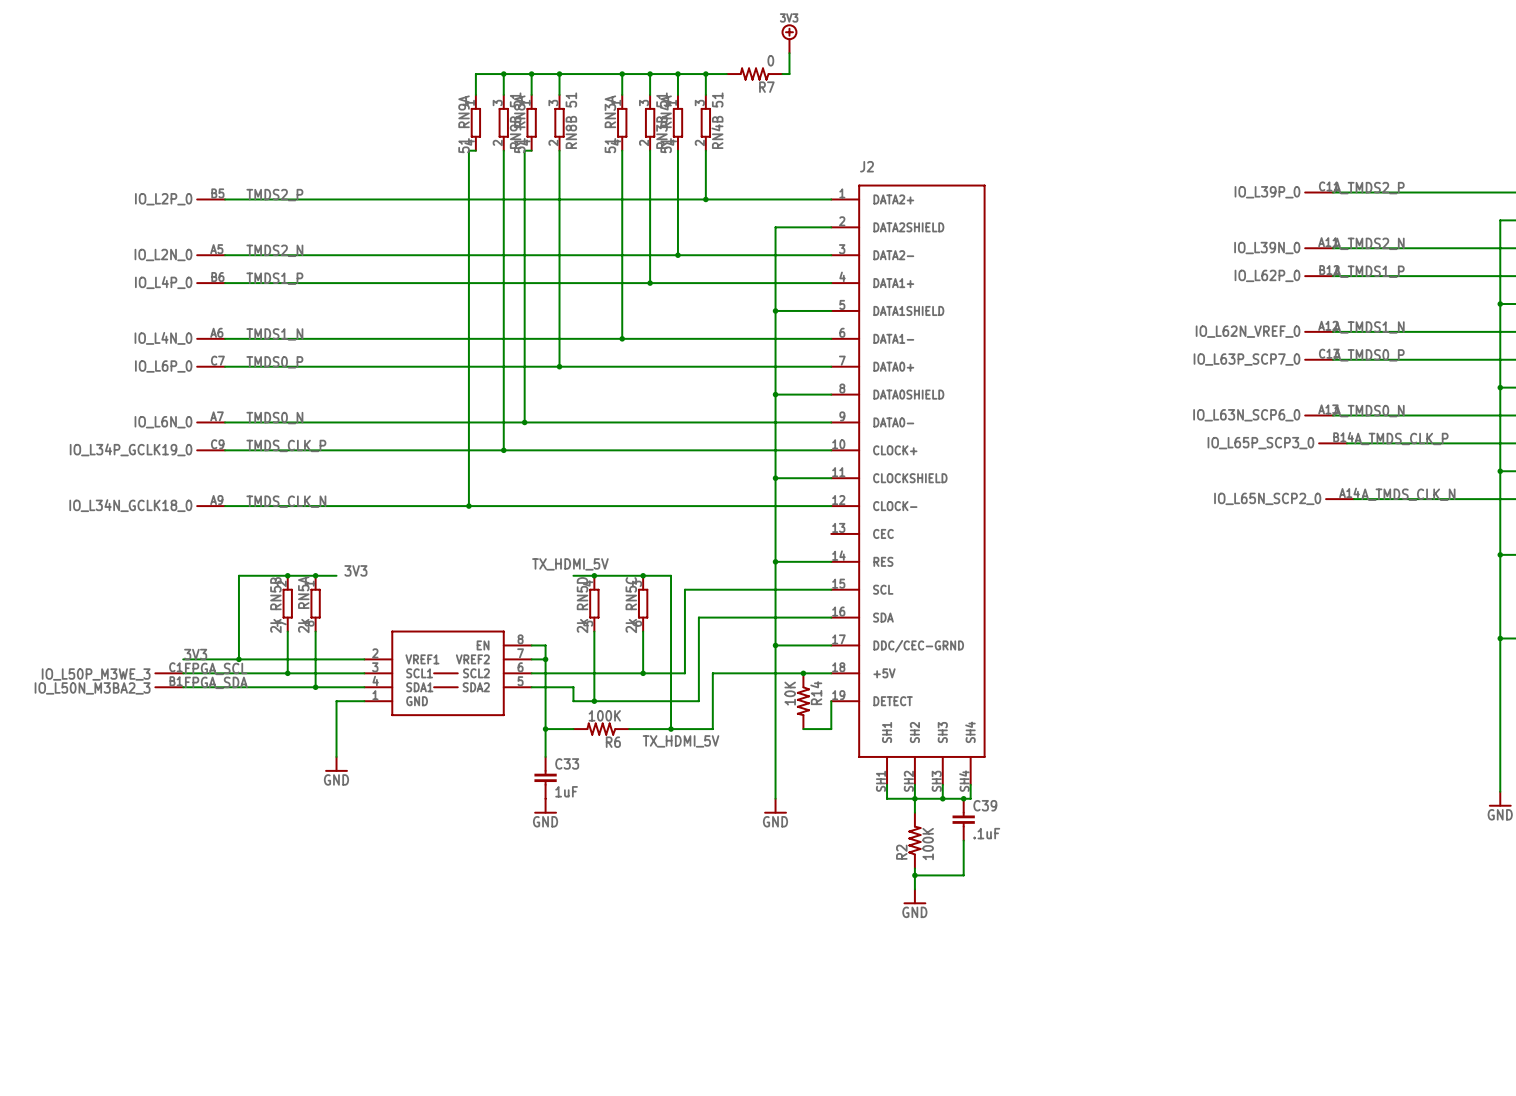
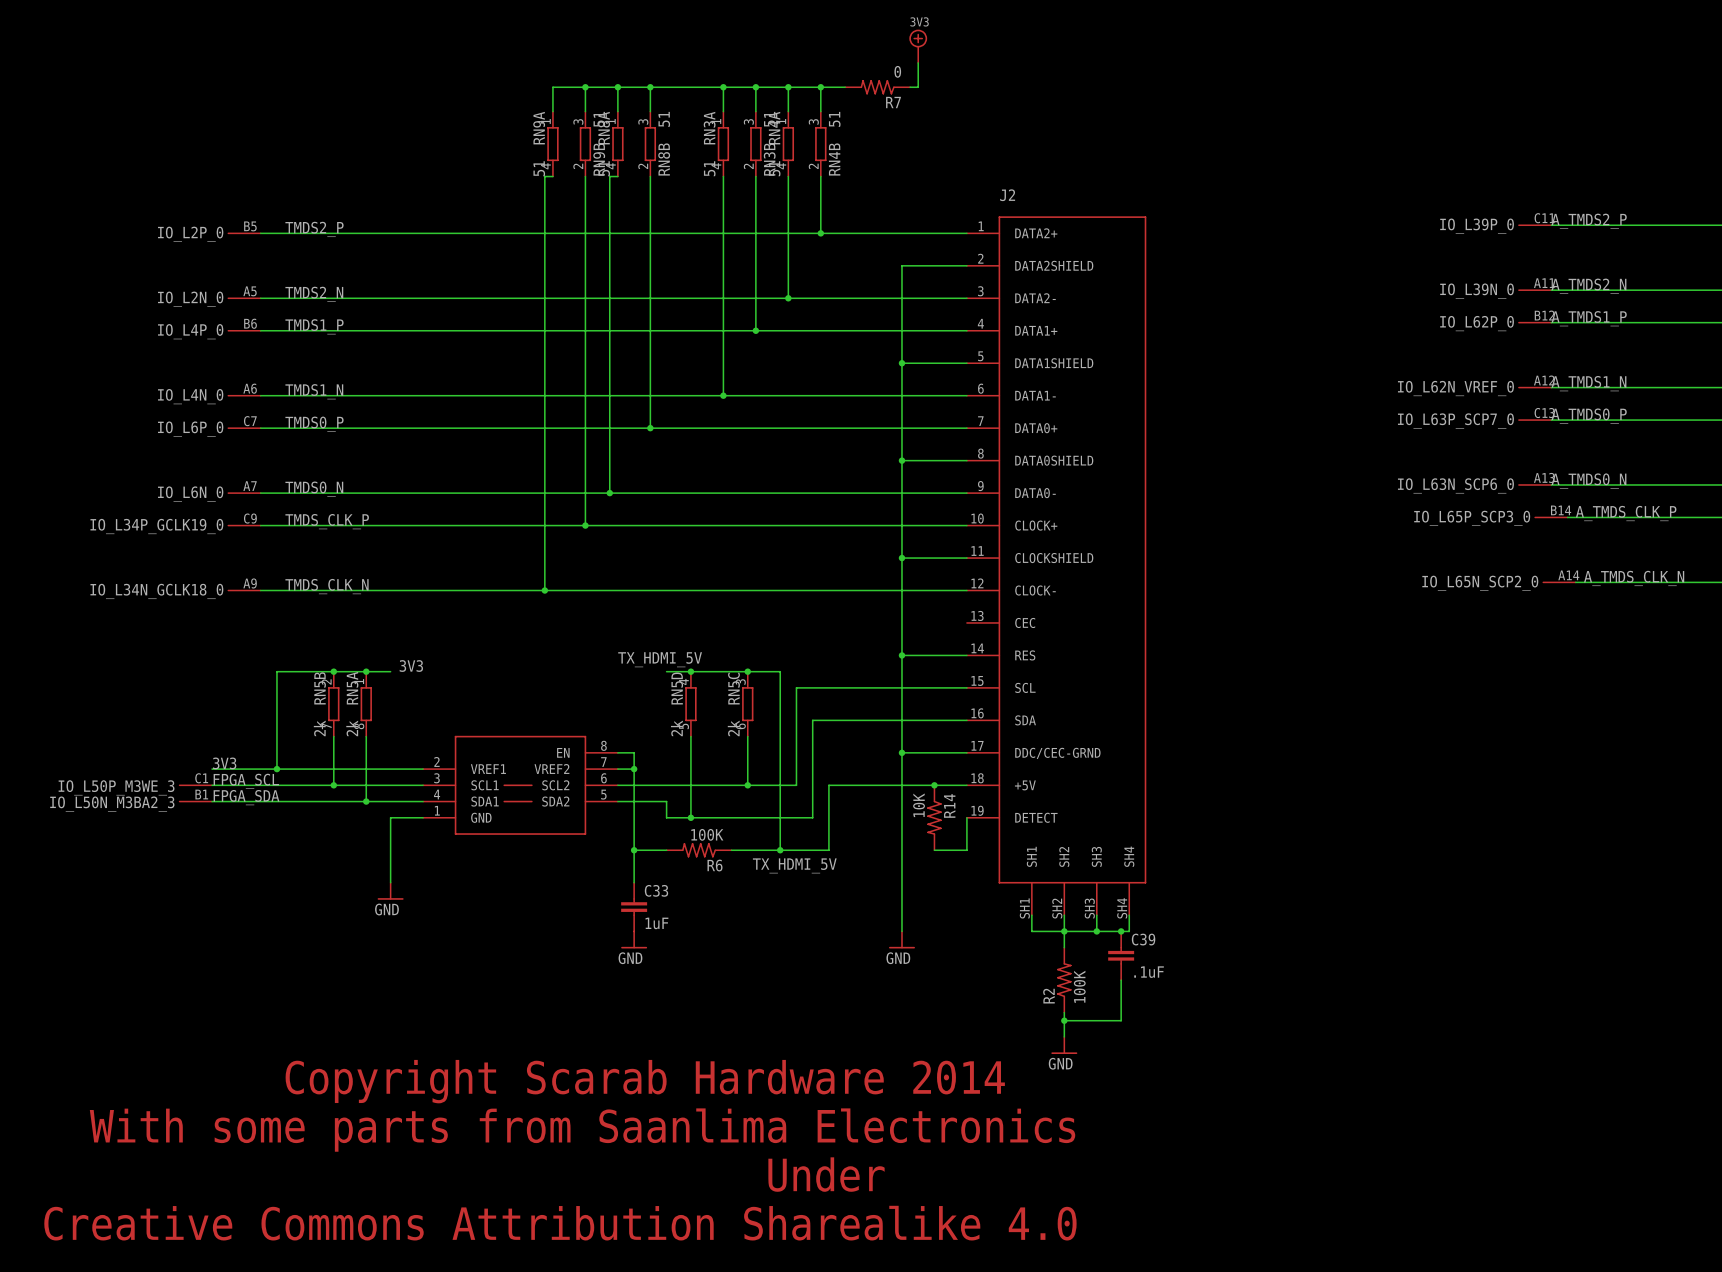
text: none -> Copyright Scarab Hardware 2014 (645, 1081)
text: none -> With some parts from Saanlima Electronics (582, 1130)
text: none -> Under (826, 1174)
text: none -> Creative Commons Attribution Sharealike 4.0 (560, 1223)

